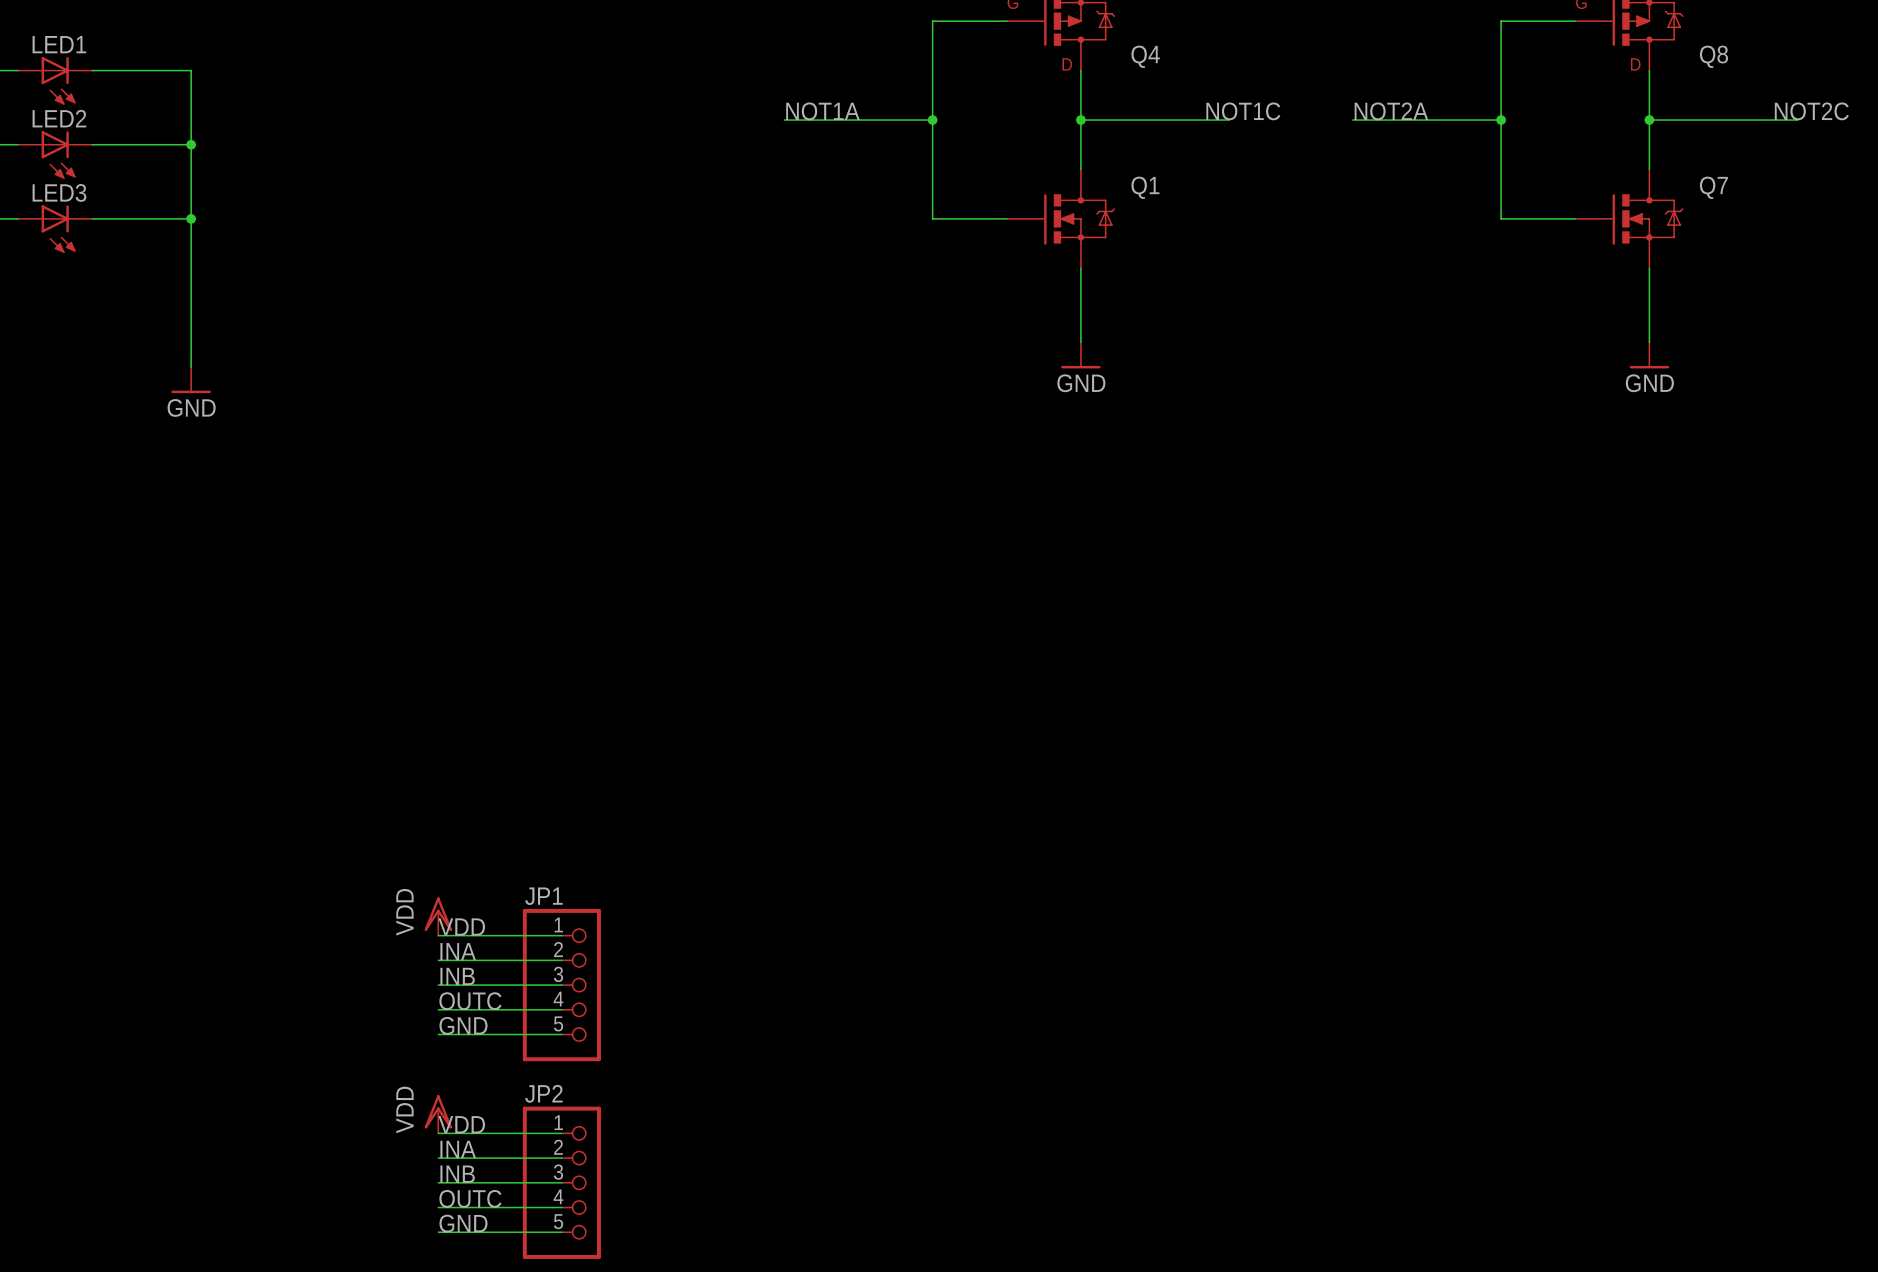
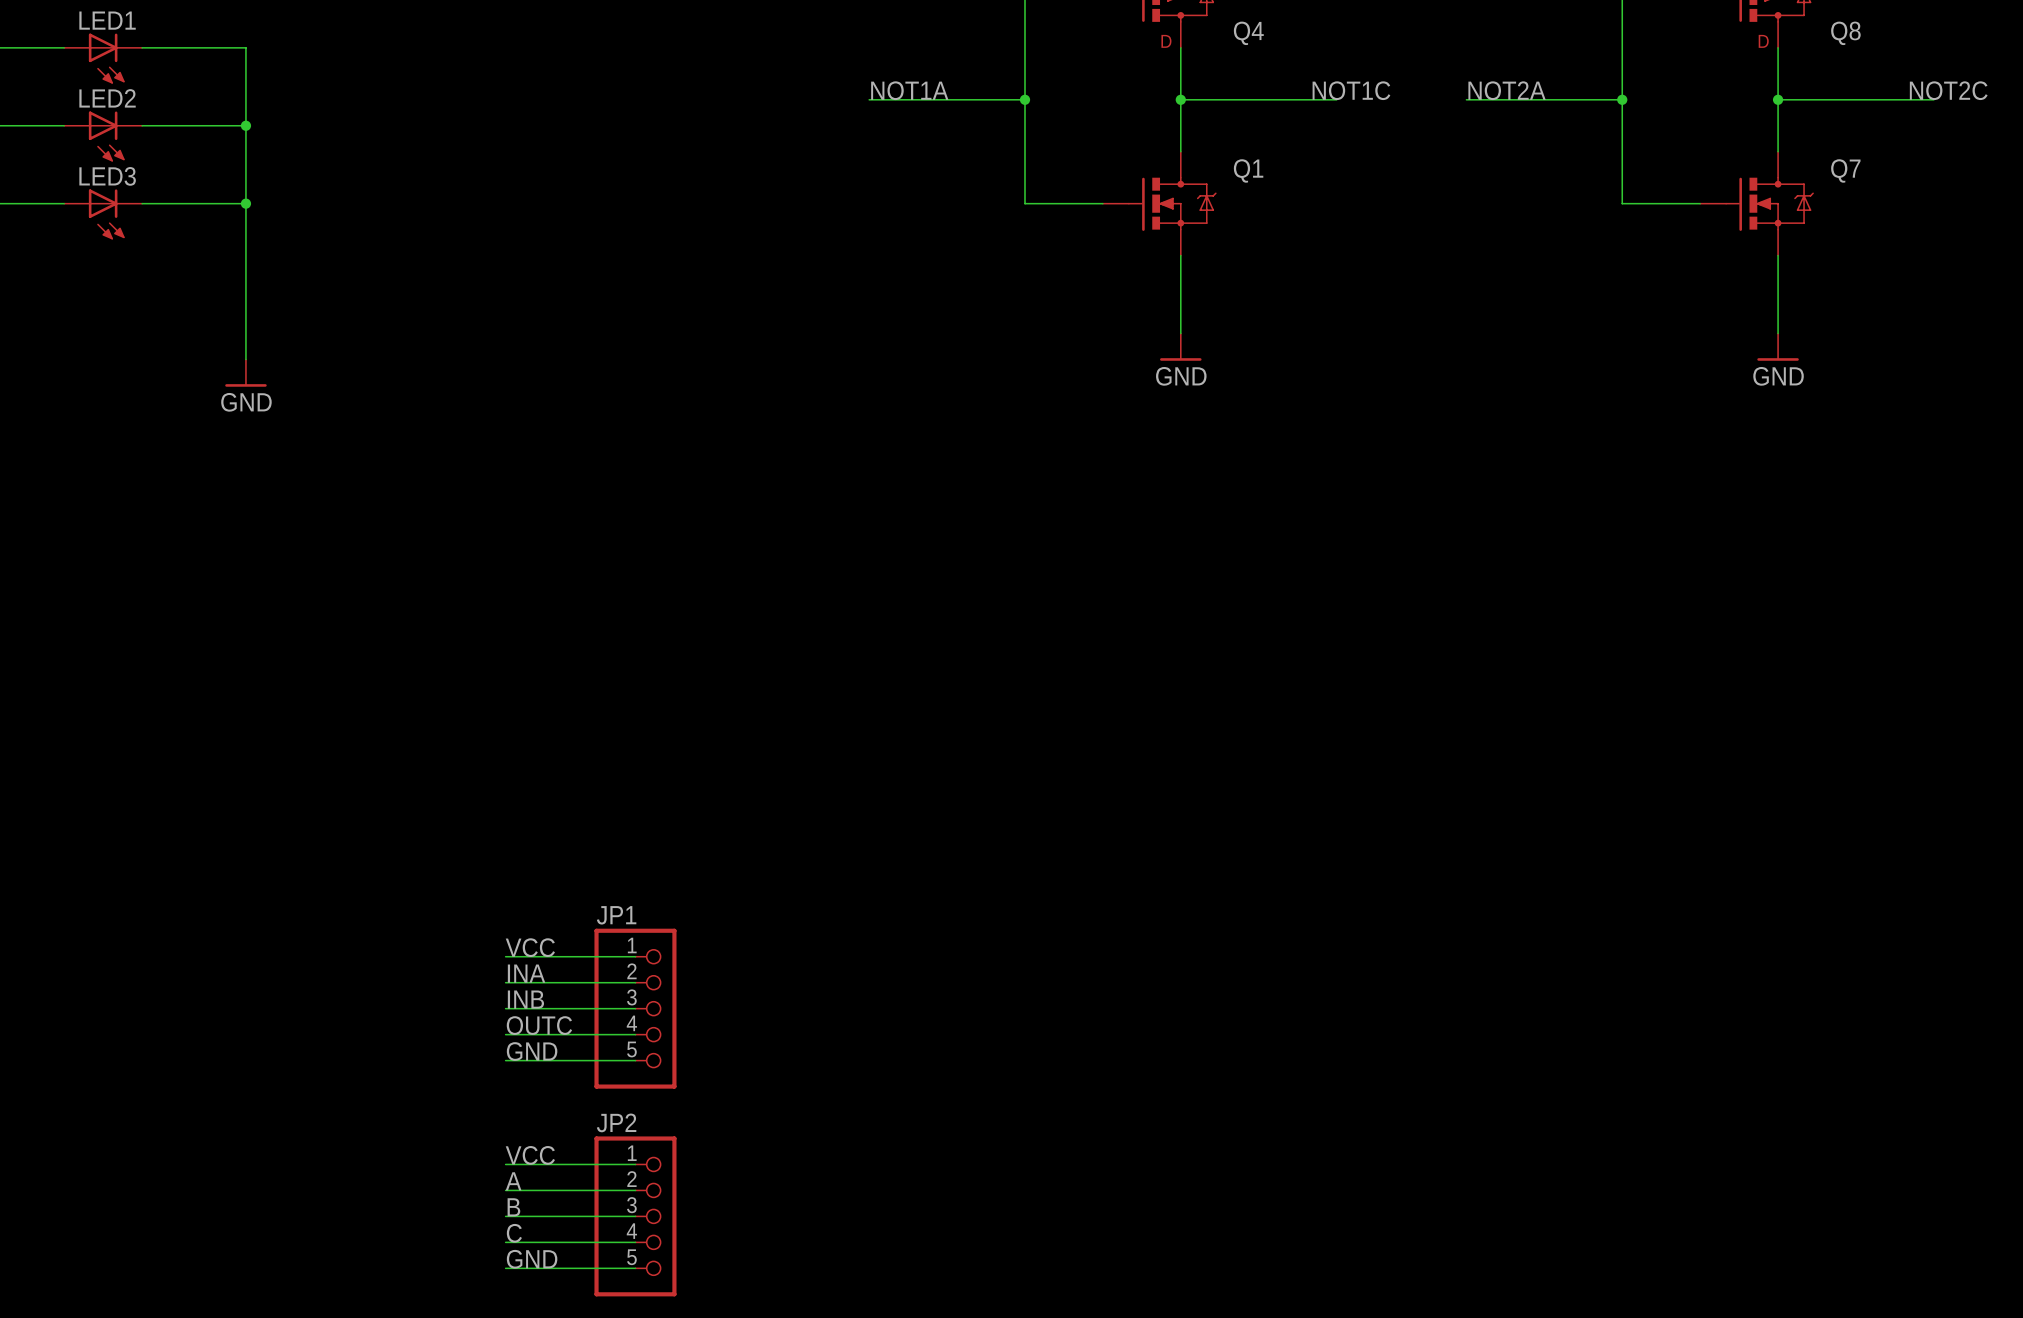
power symbol: VDD (438, 916) -> none
label: VDD (461, 927) -> VCC (530, 947)
power symbol: VDD (438, 1114) -> none
label: VDD (461, 1124) -> VCC (530, 1155)
label: INA (458, 1149) -> A (513, 1181)
label: INB (457, 1174) -> B (513, 1207)
label: OUTC (470, 1198) -> C (514, 1233)

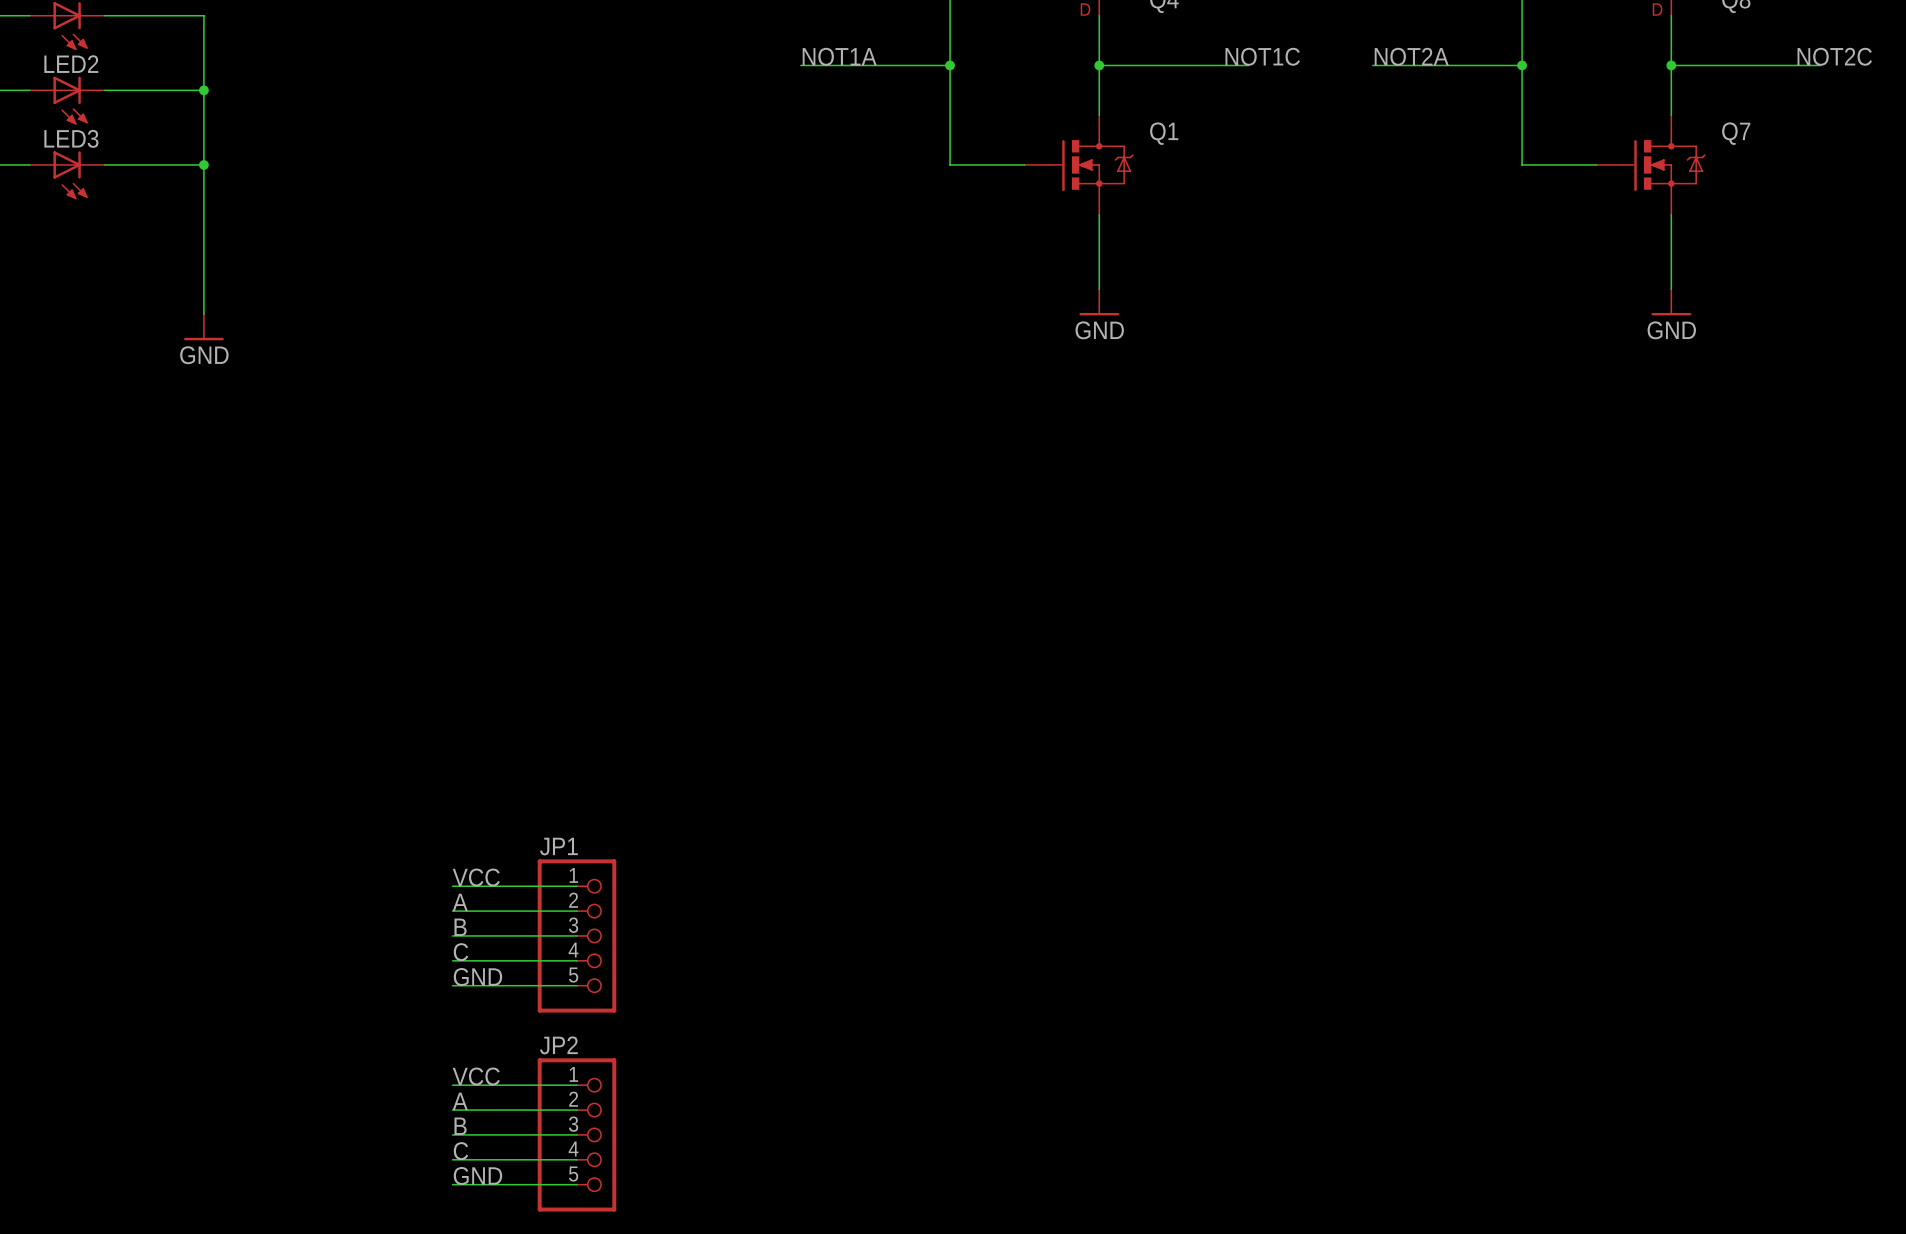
label: INA (526, 973) -> A (460, 902)
label: INB (525, 999) -> B (460, 927)
label: OUTC (539, 1025) -> C (460, 952)

